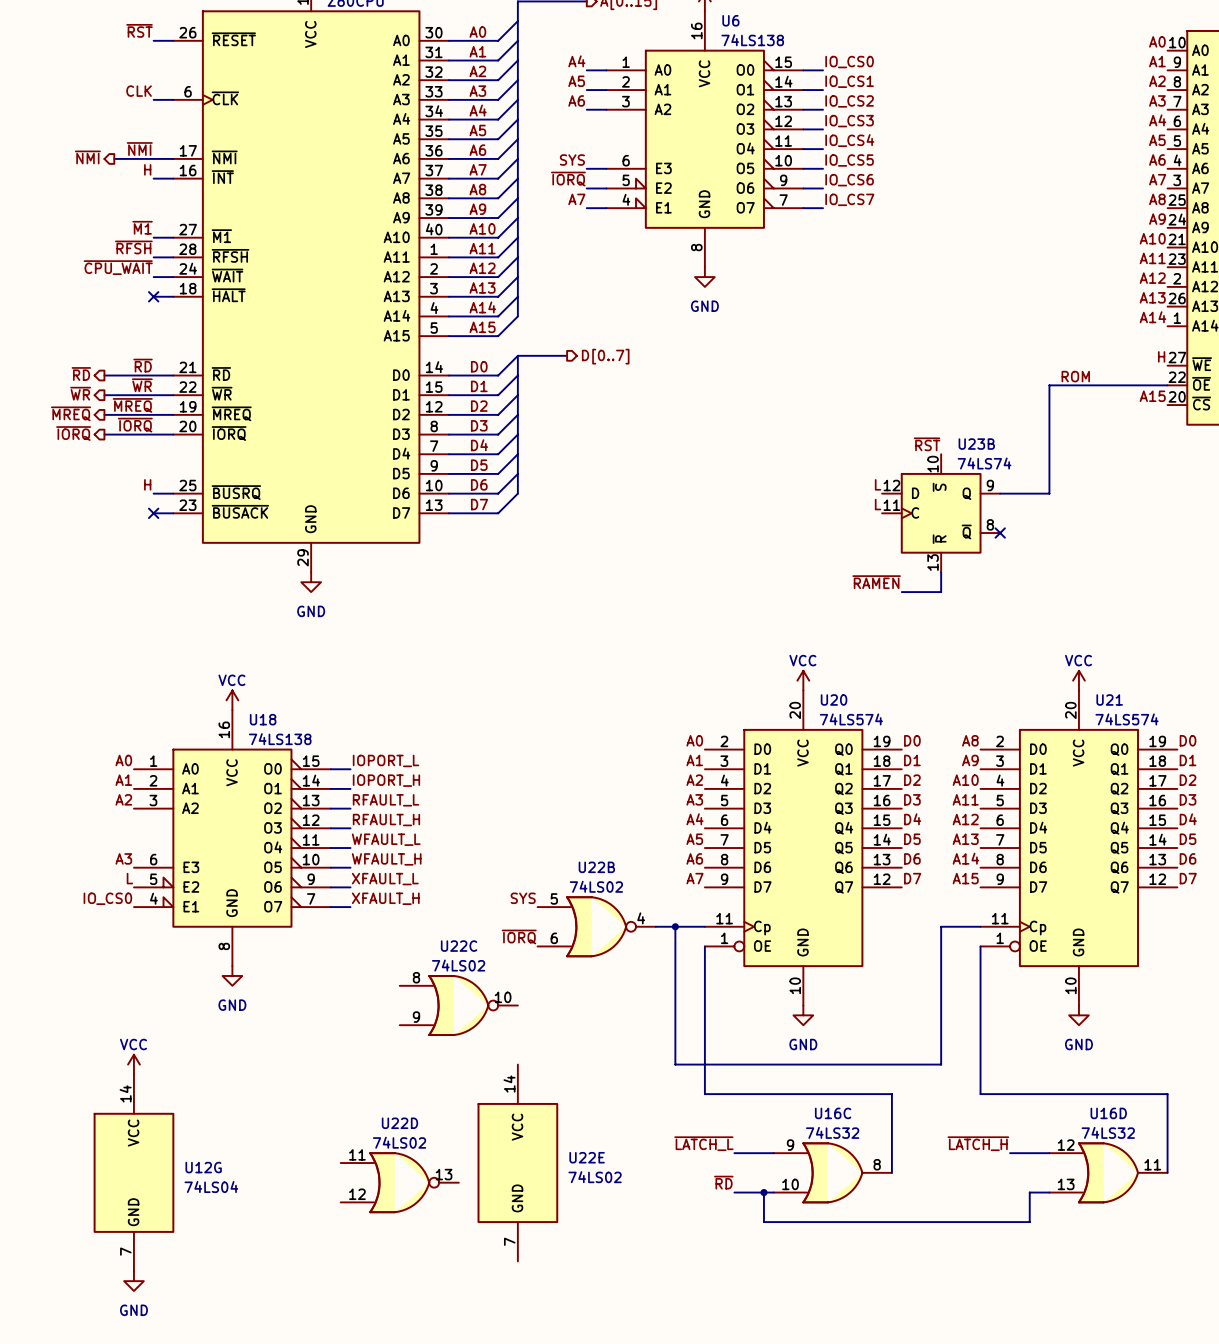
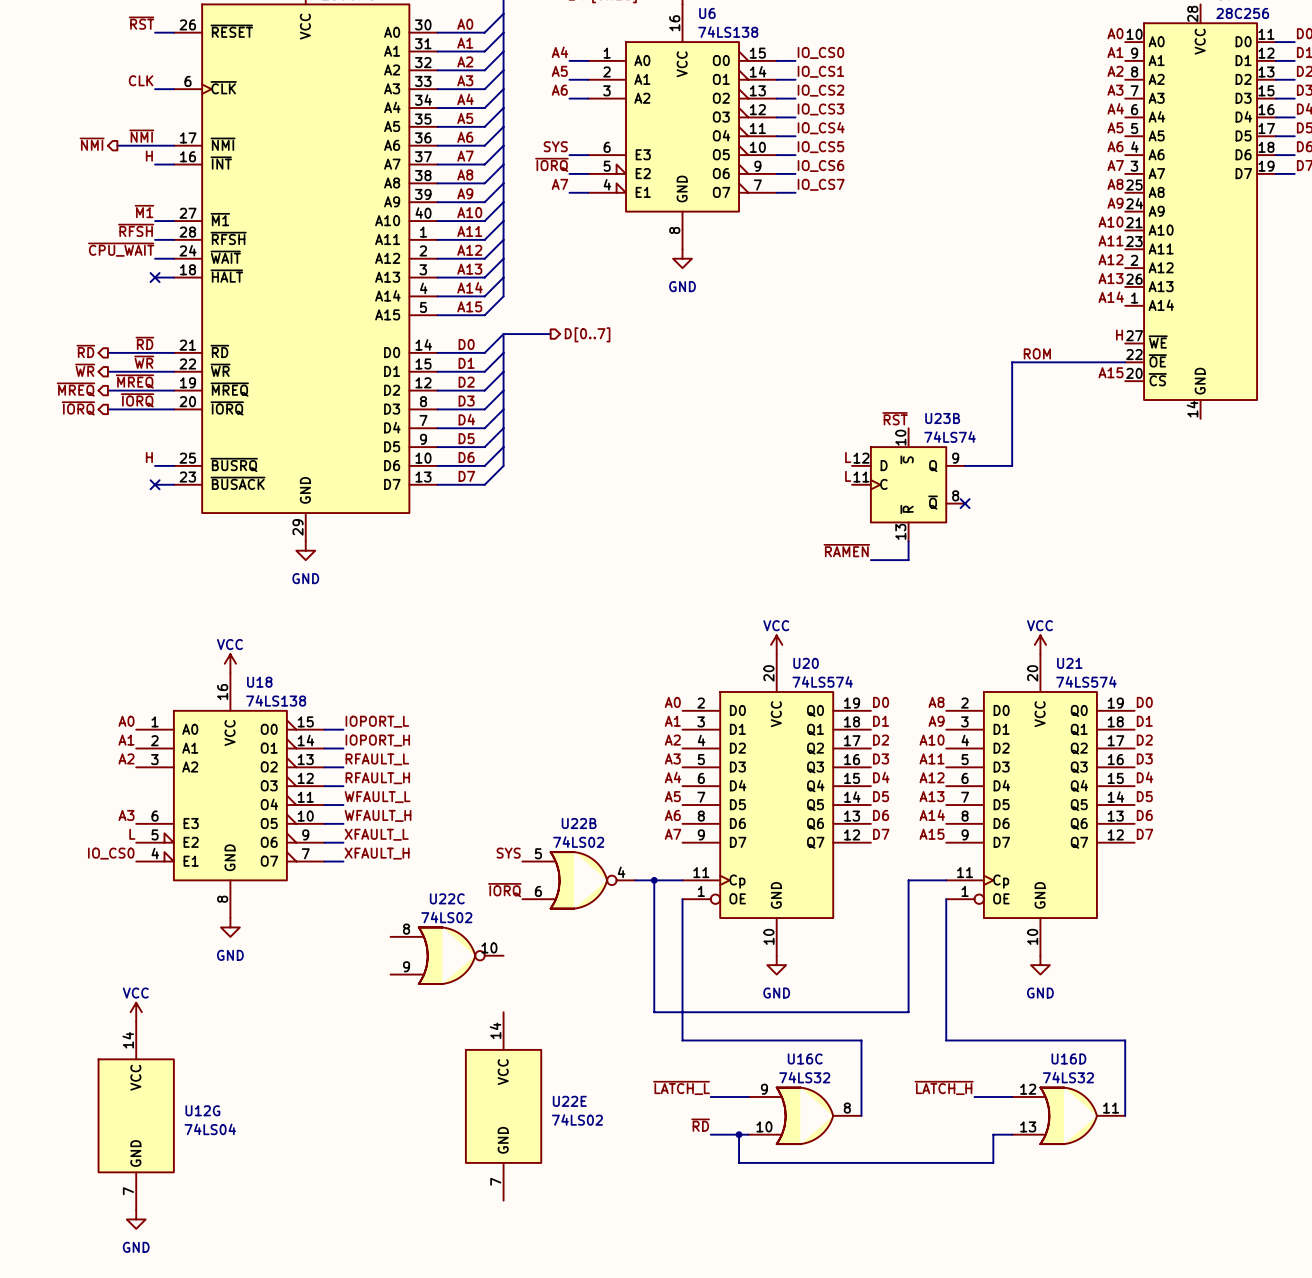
U22D: 74LS02 (399, 1182) -> none

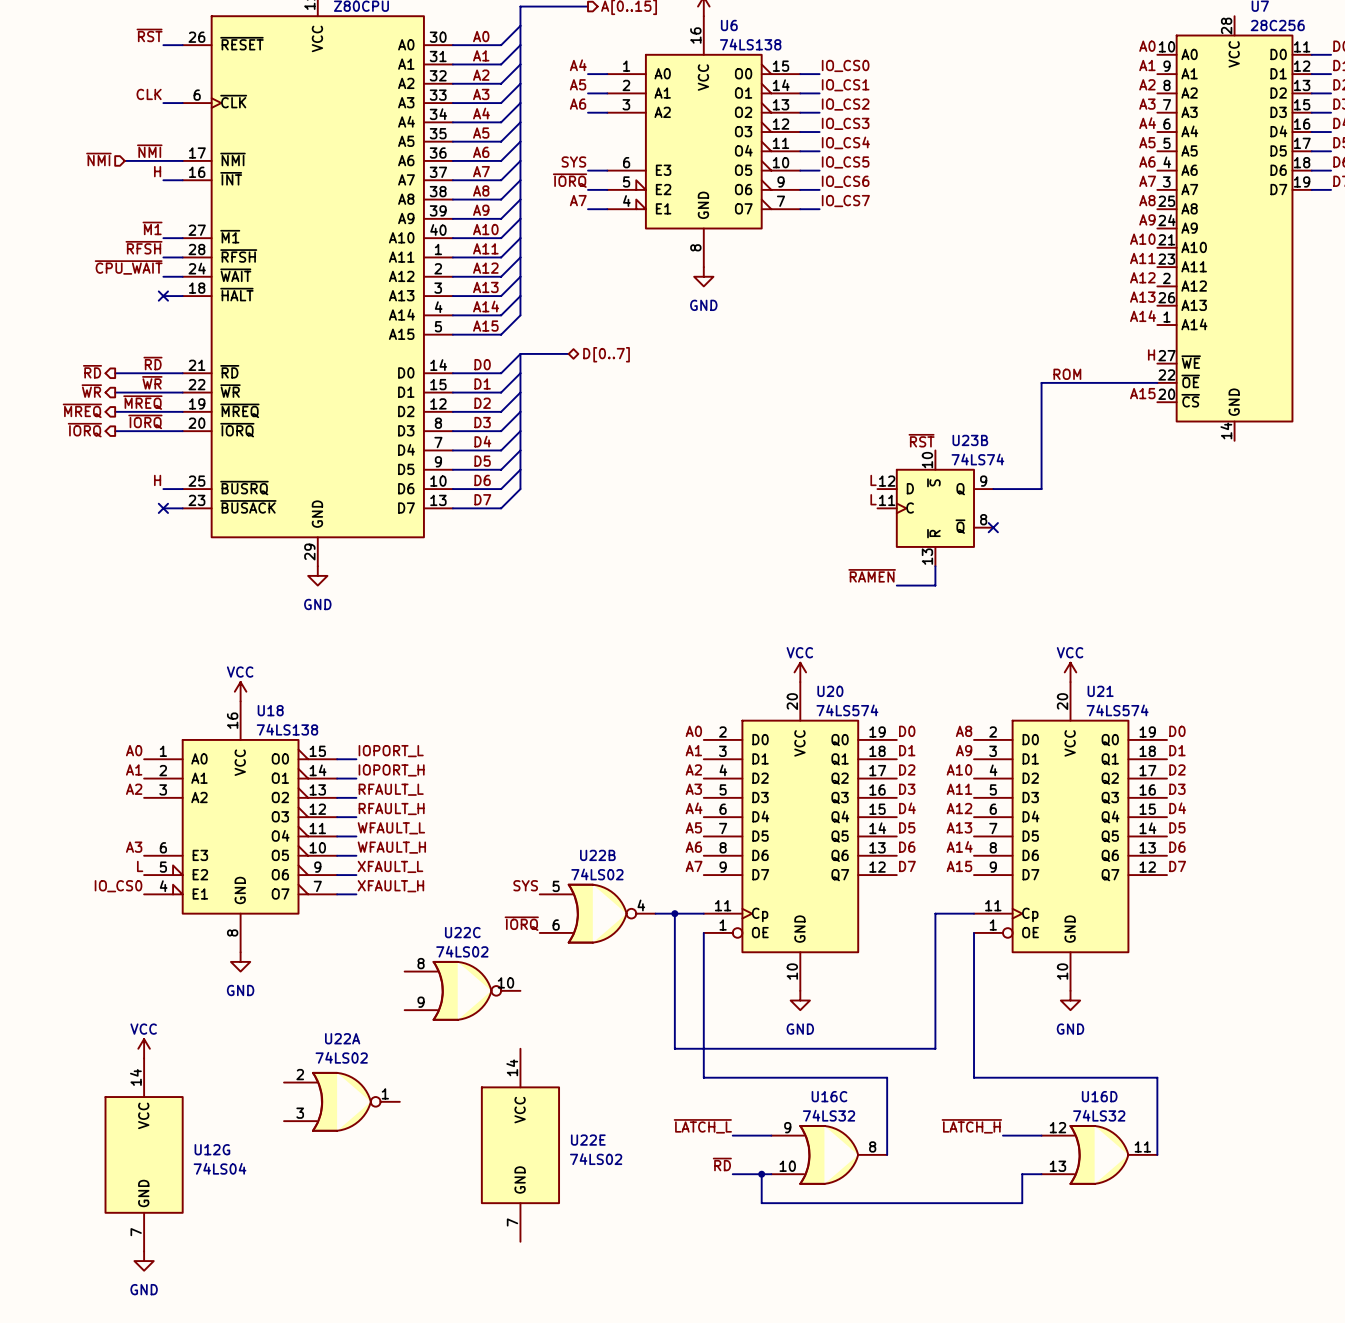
hierarchical label shape: output (92, 144) -> input (98, 159)
hierarchical label shape: output (587, 334) -> bidirectional (606, 354)
U22A: none -> 74LS02 (341, 1101)

